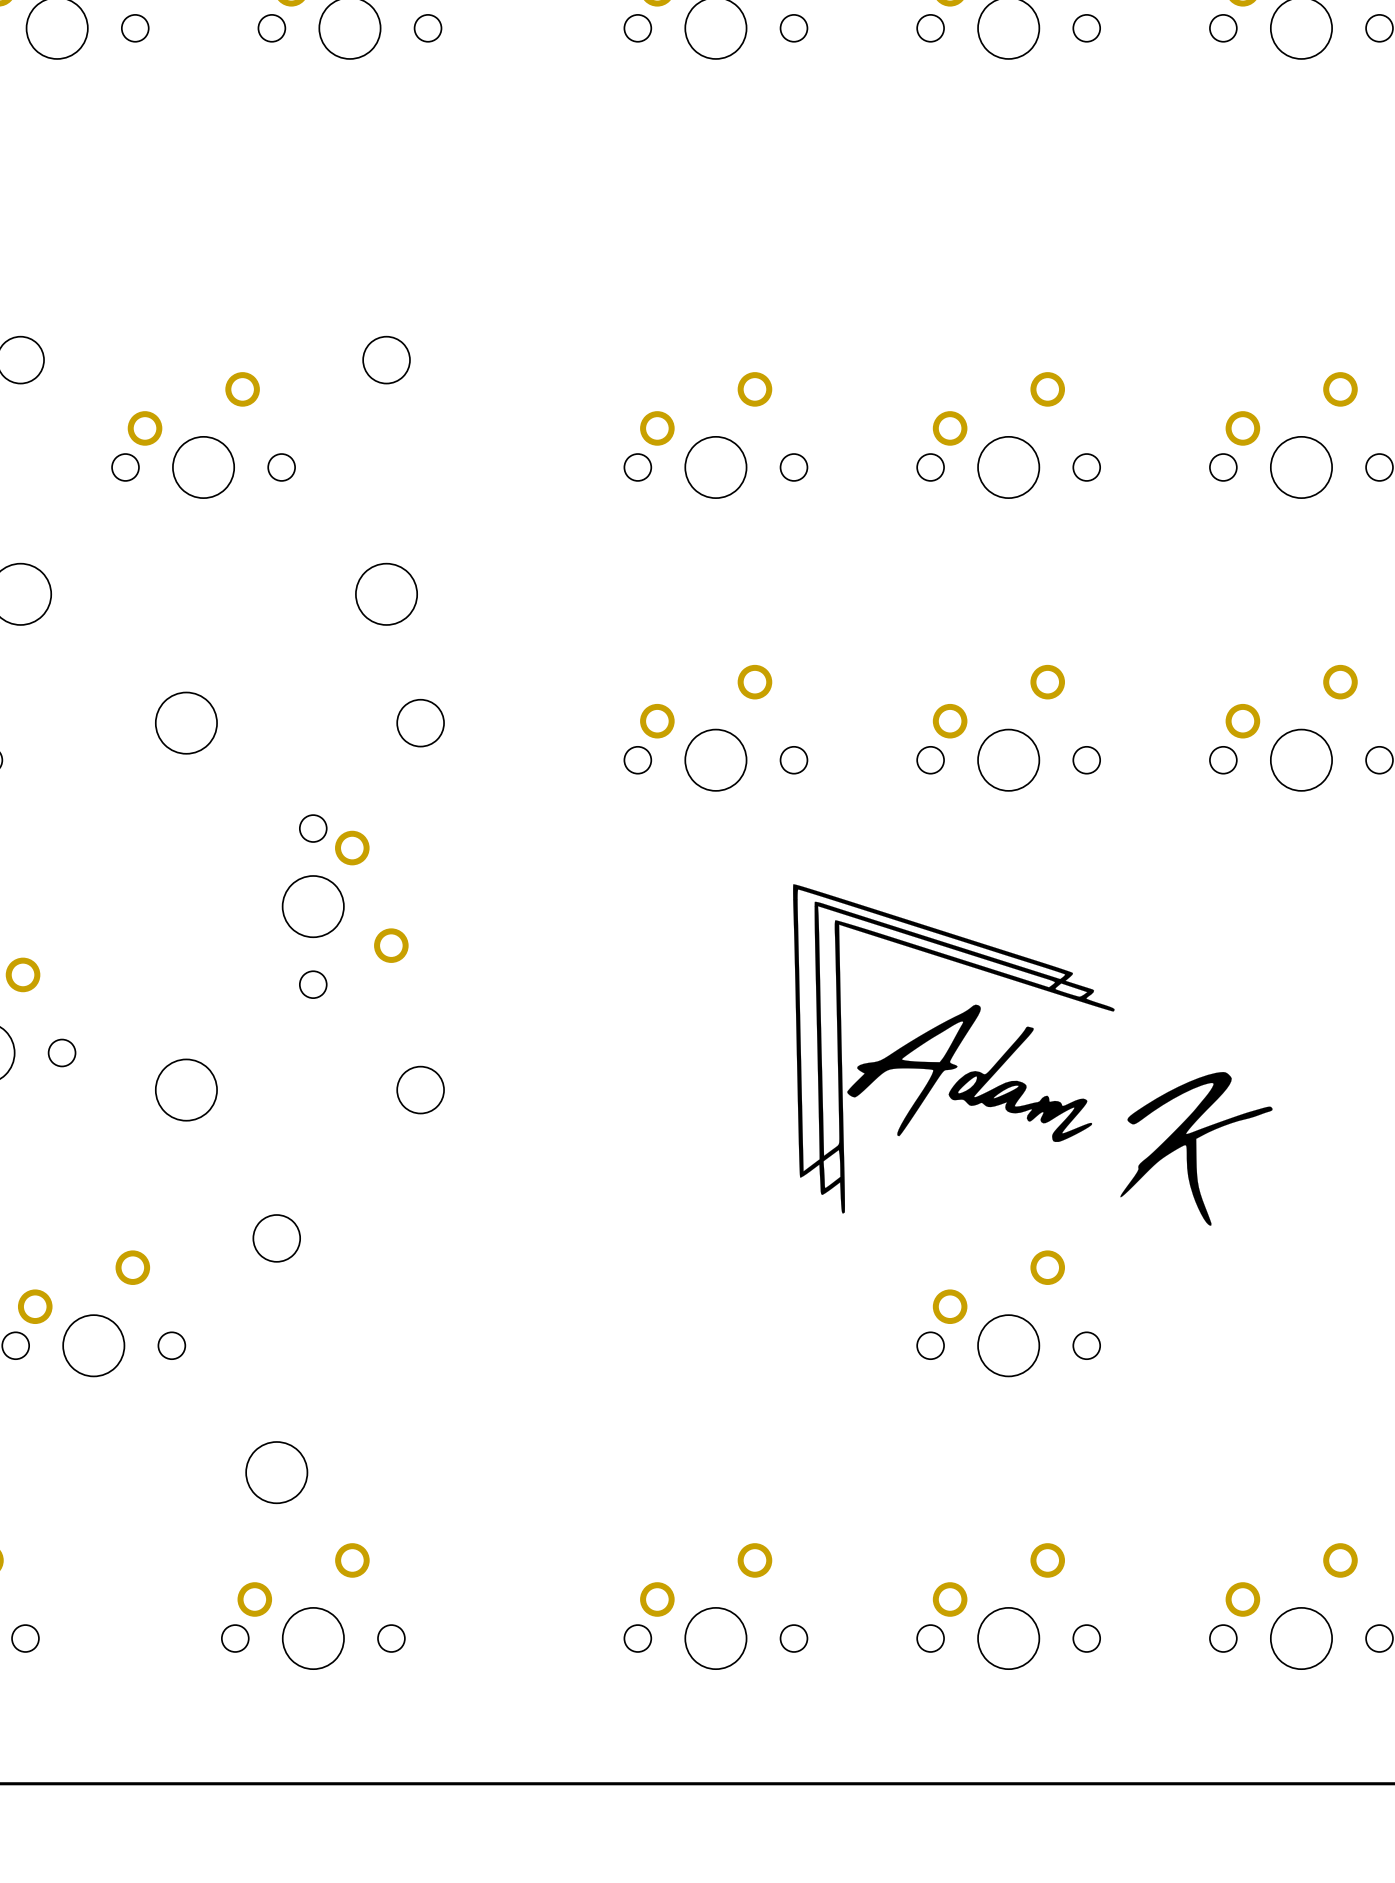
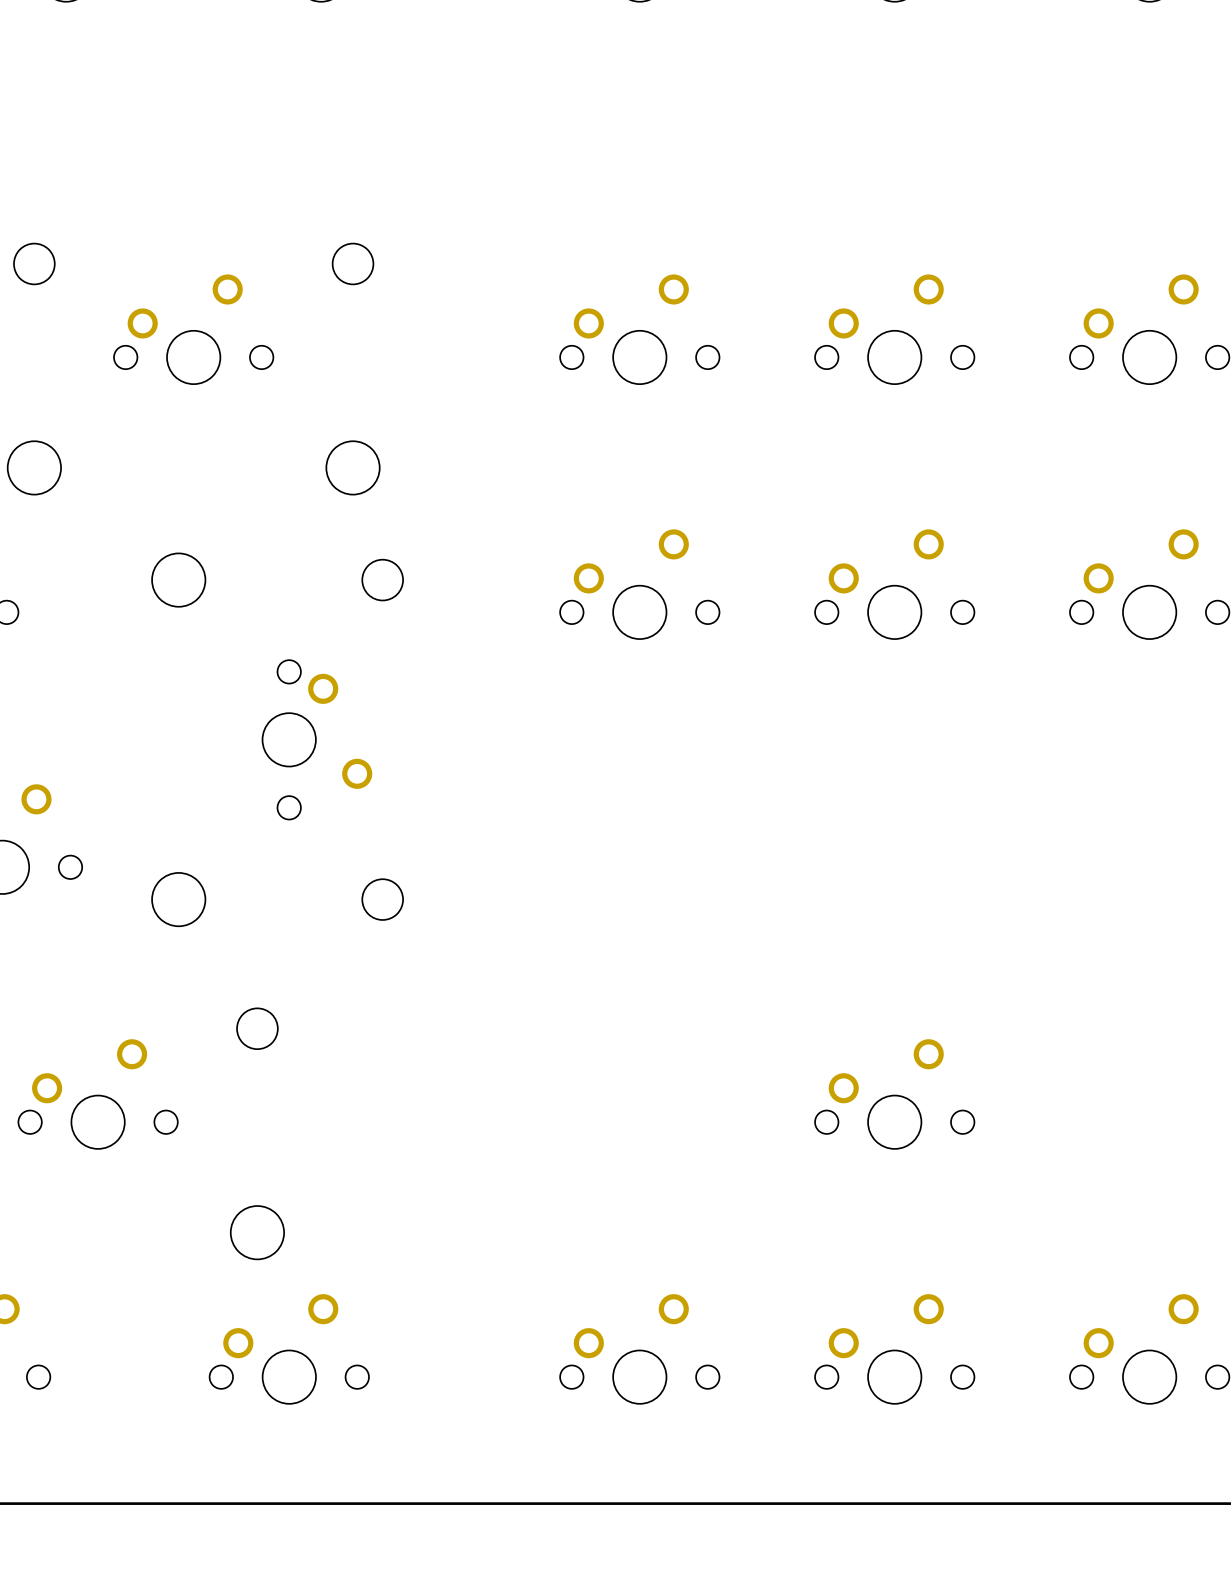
drawing: [793, 884, 1273, 1226] -> none

